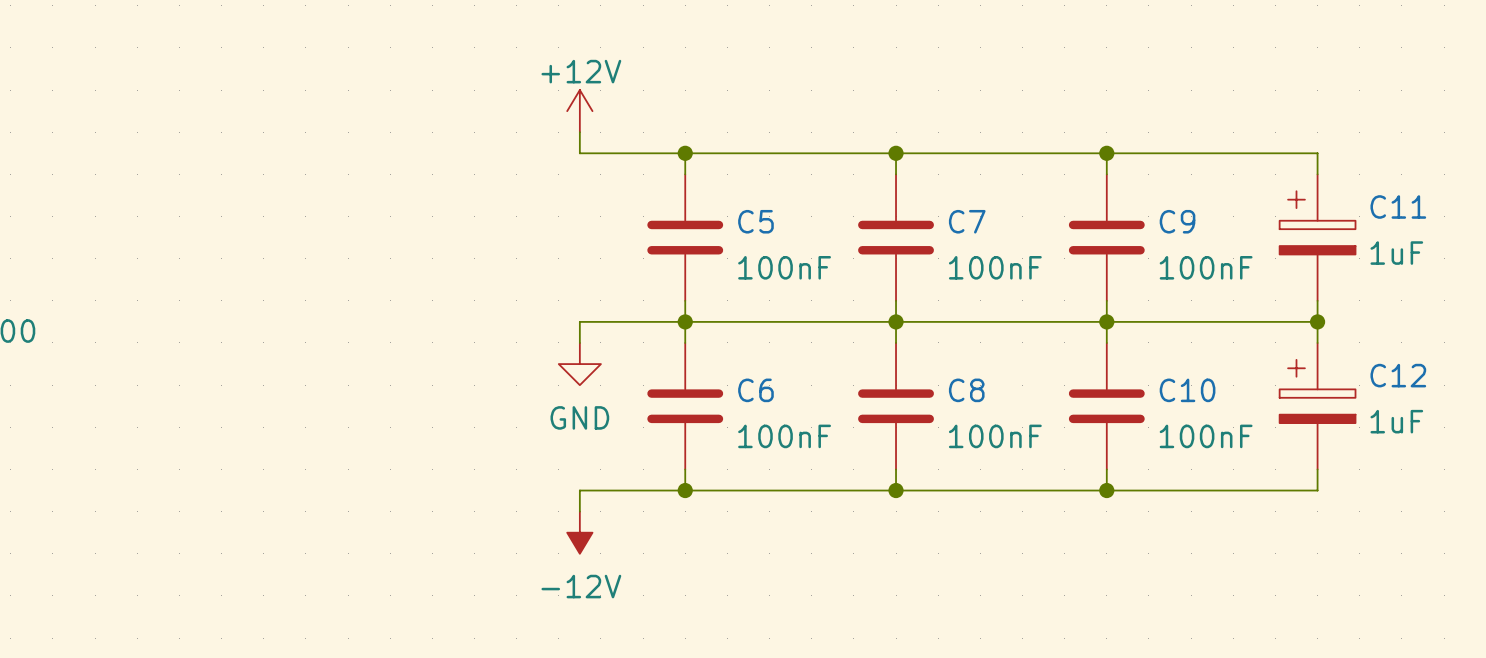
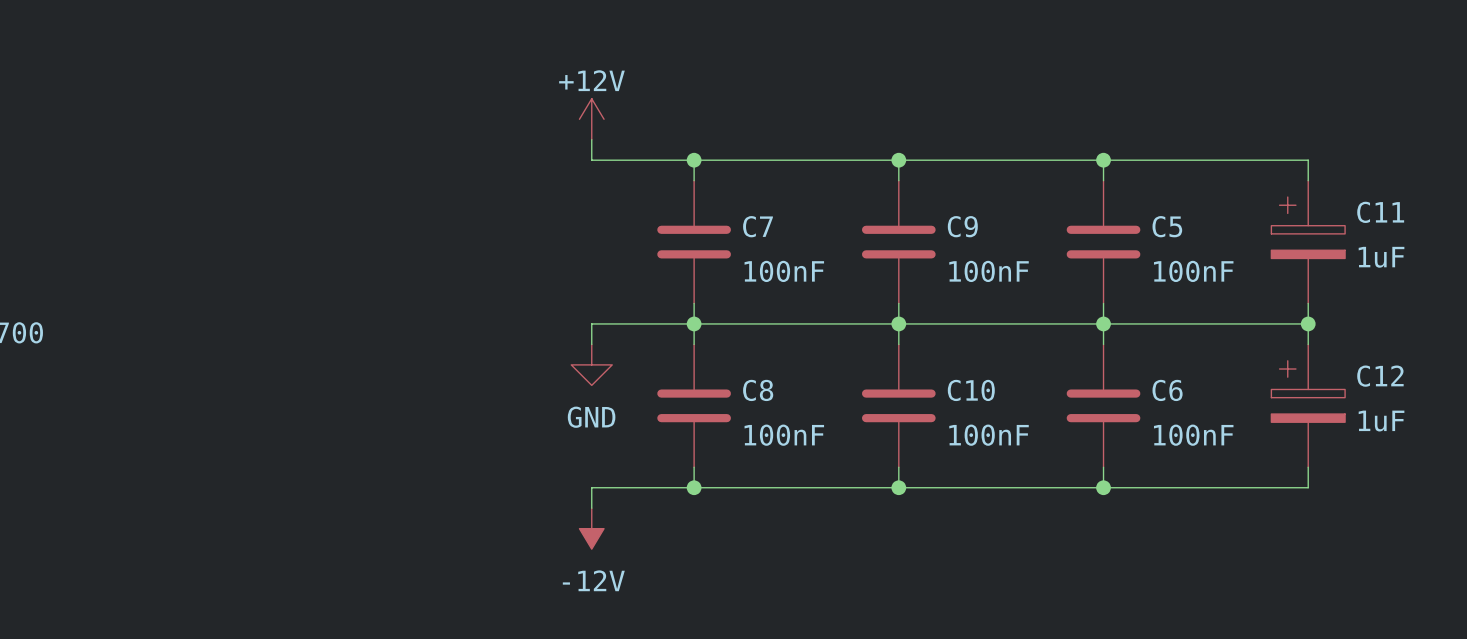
C5 name: C5 (755, 221) -> C7 (757, 226)
C7 name: C7 (967, 221) -> C9 (962, 226)
C9 name: C9 (1177, 221) -> C5 (1167, 226)
C6 name: C6 (755, 390) -> C8 (758, 390)
C8 name: C8 (966, 390) -> C10 (971, 390)
C10 name: C10 (1187, 390) -> C6 (1167, 390)

